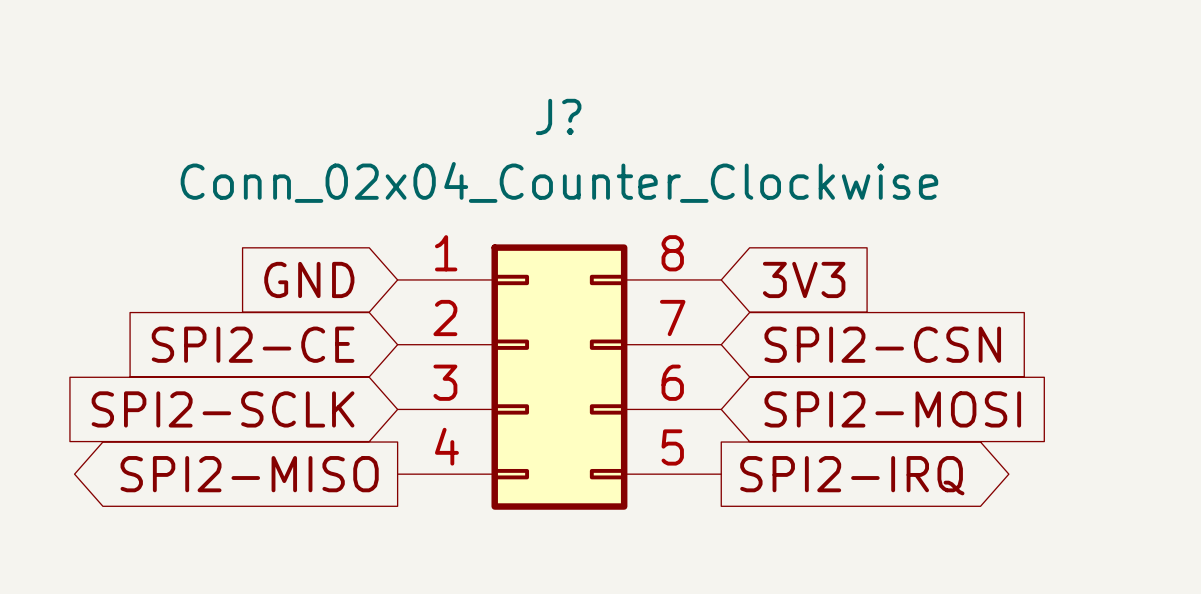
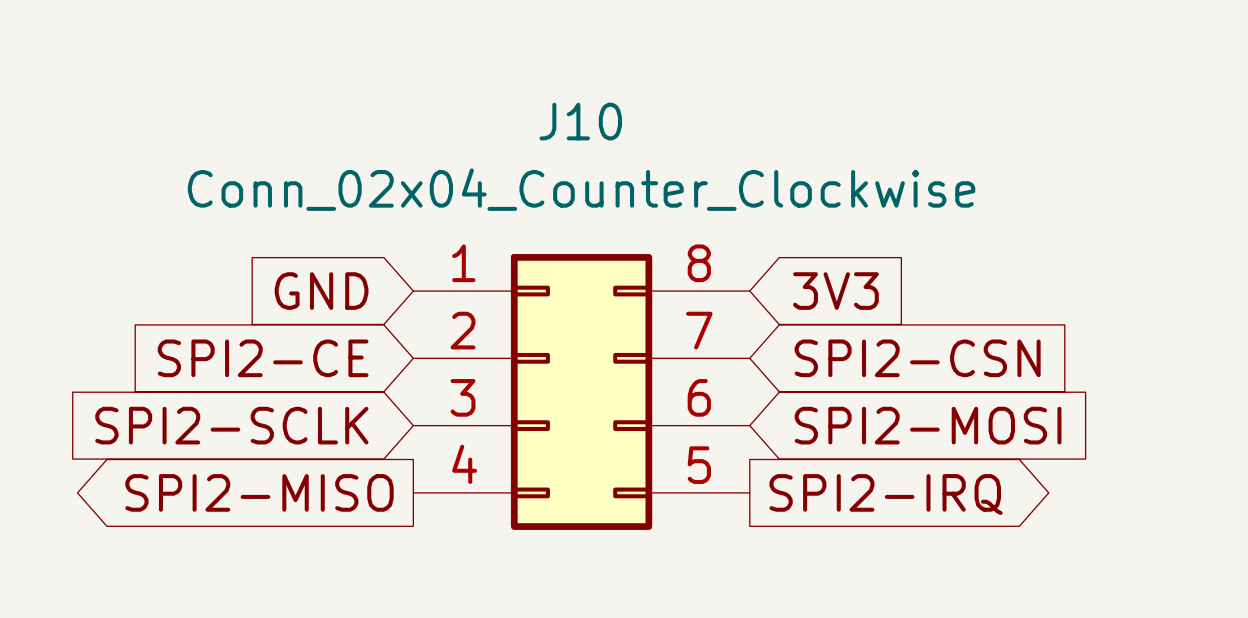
J? name: J? (558, 116) -> J10 (580, 121)

